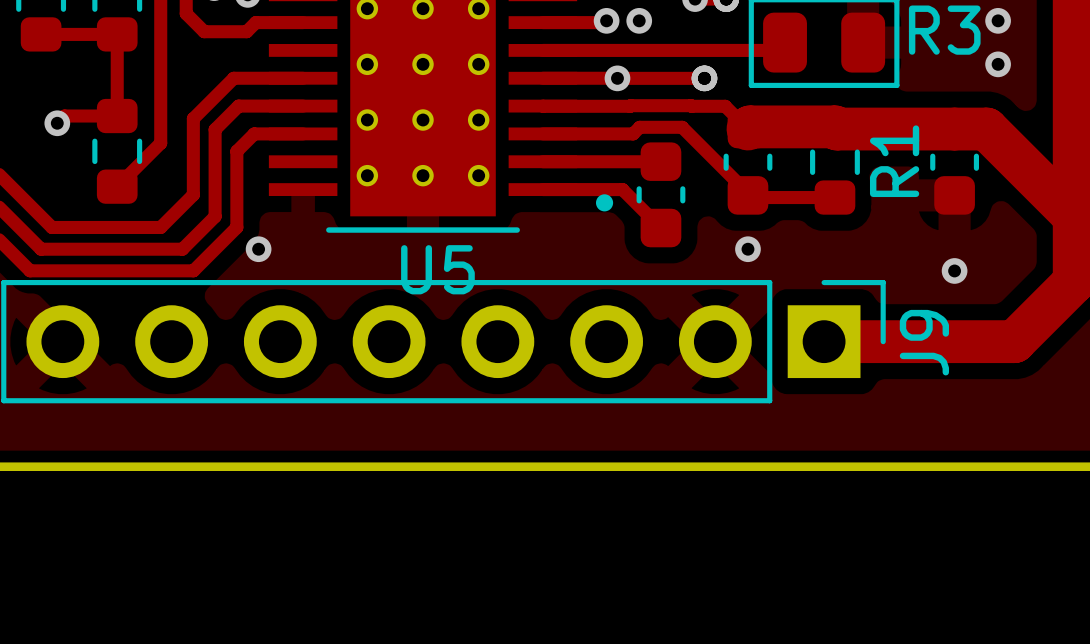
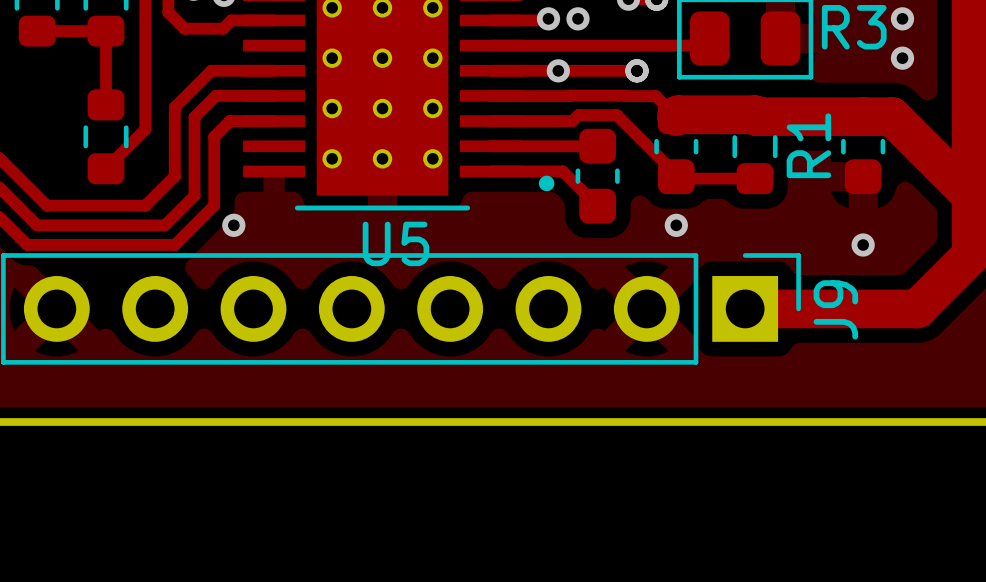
track: (117, 116) (64, 116) (57, 123) -> none
via: (57, 123) -> none

